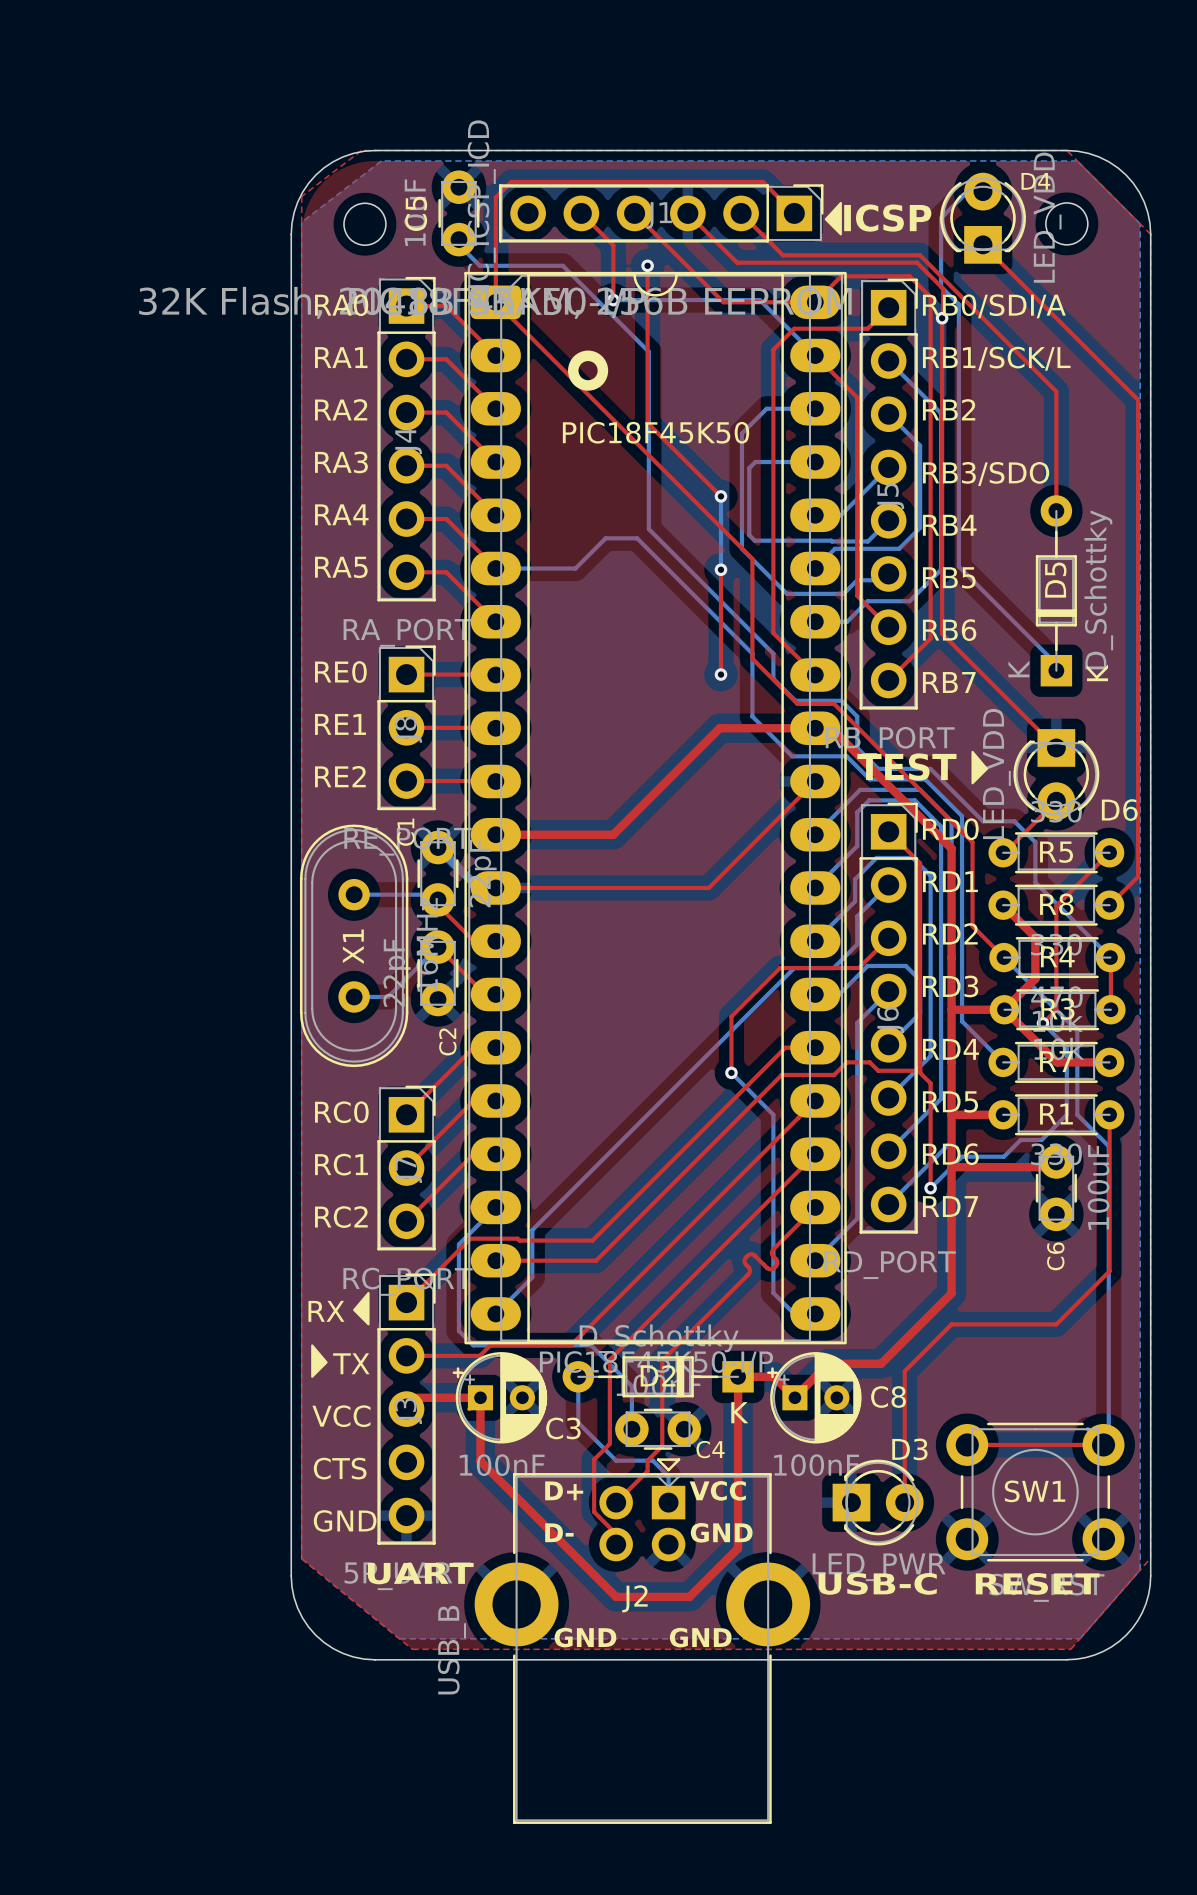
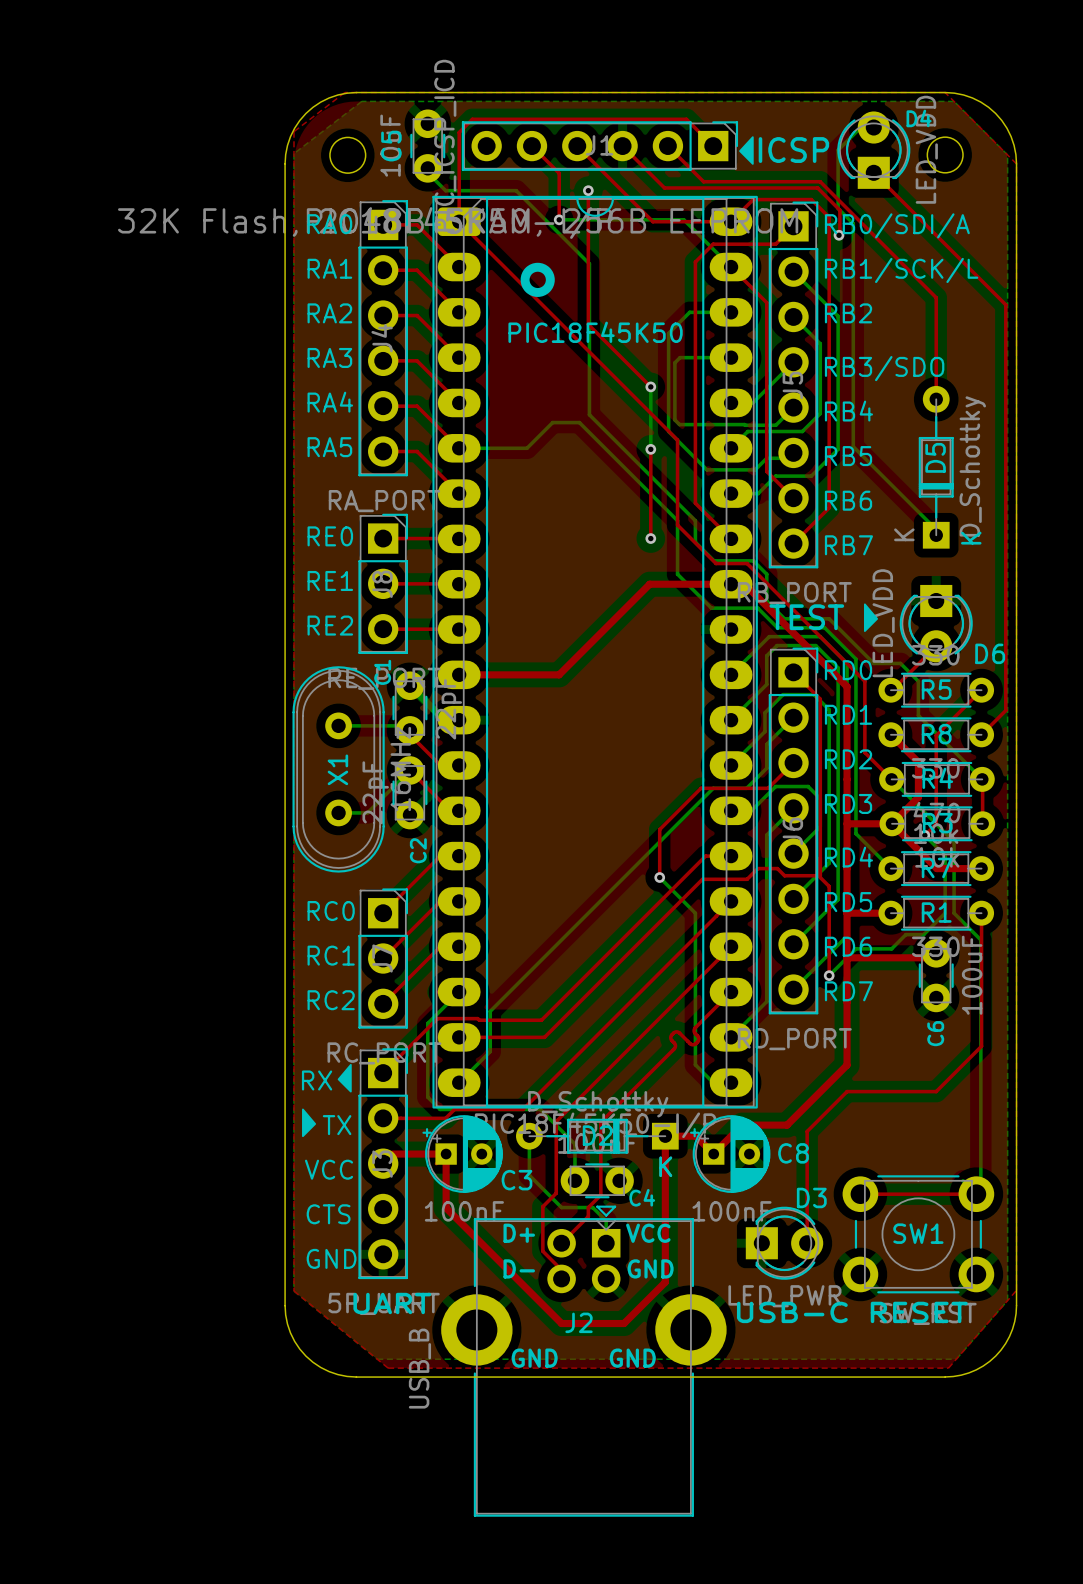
top track: (942, 318) (942, 633) (1056, 747) -> none
top track: (815, 781) (708, 887) (495, 887) -> none

